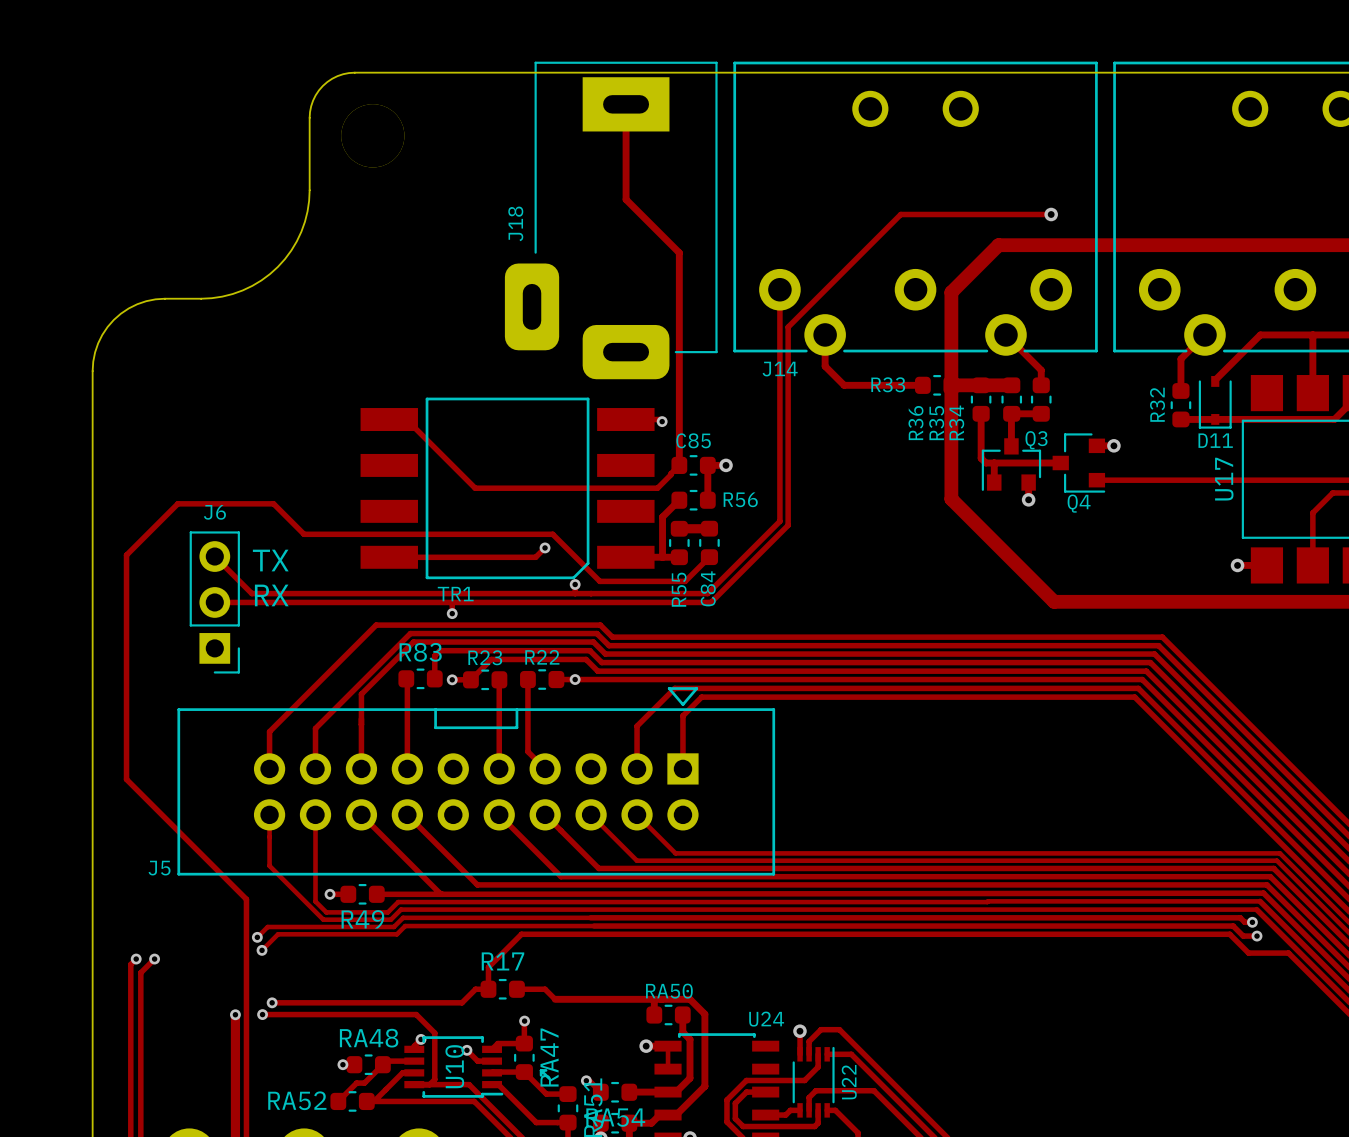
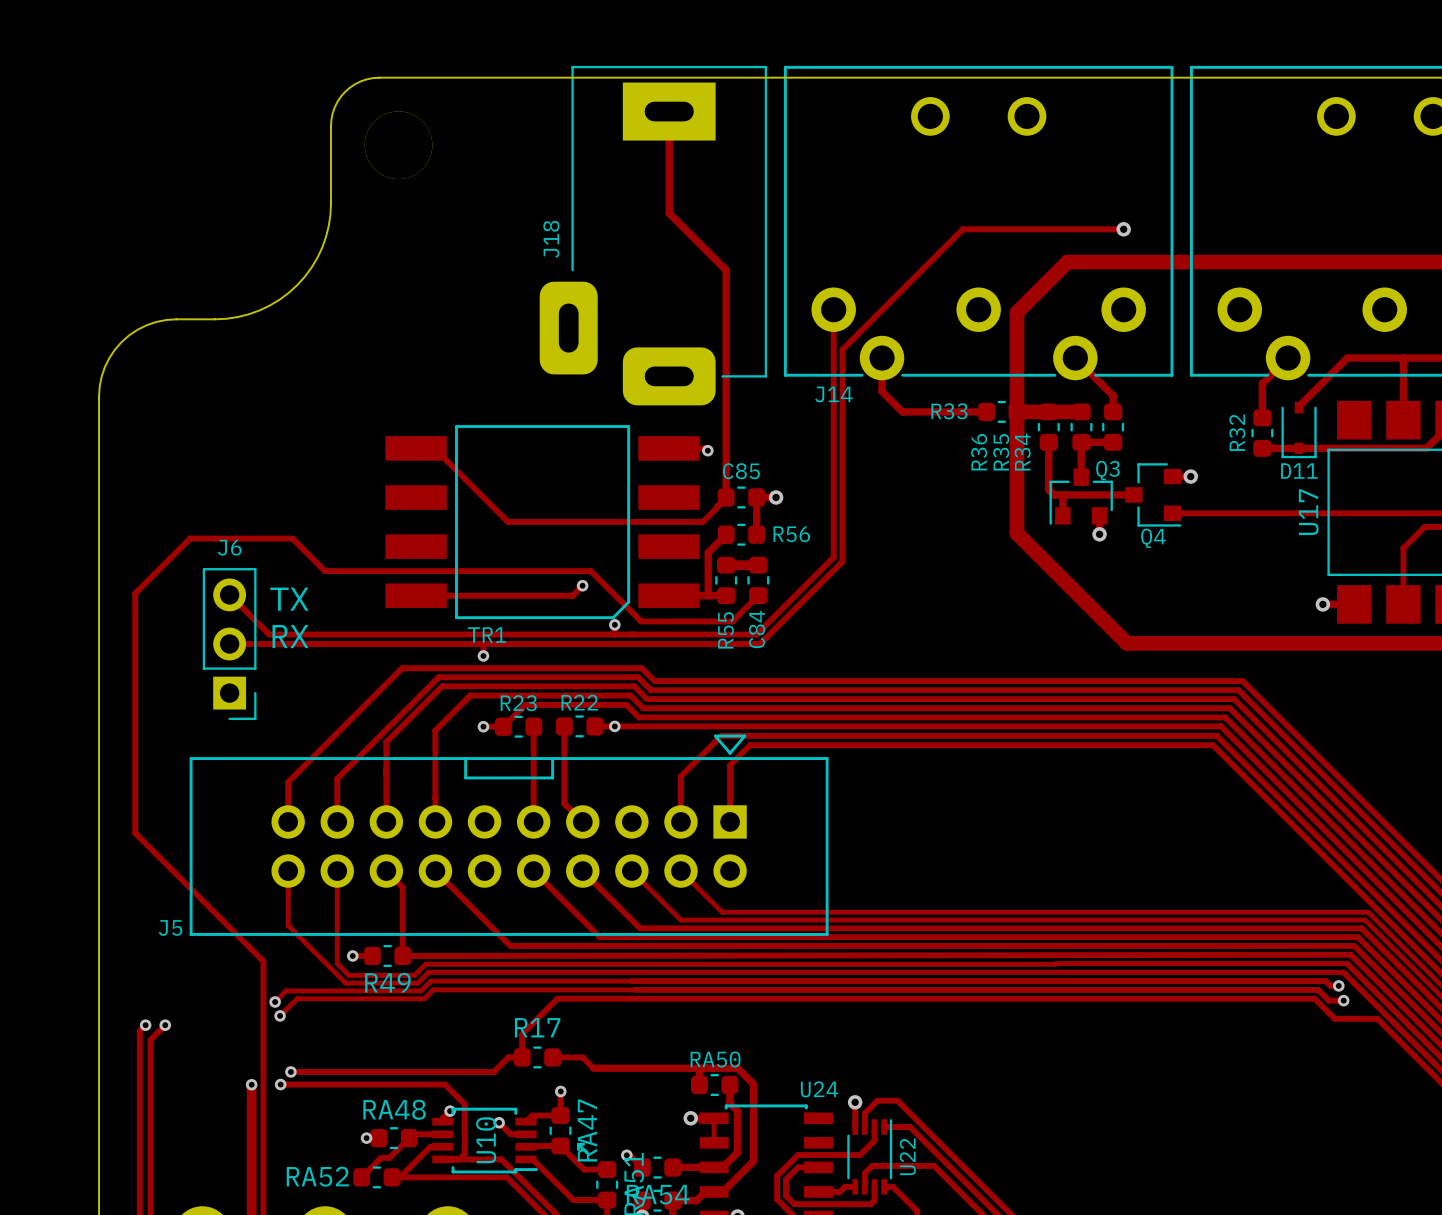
track: (434, 655) (434, 678) -> none
track: (406, 678) (407, 746) -> (464, 701) (435, 730) (435, 798)
R83: (420, 678) -> none
track: (376, 830) (442, 894) -> (402, 887) (402, 955)

